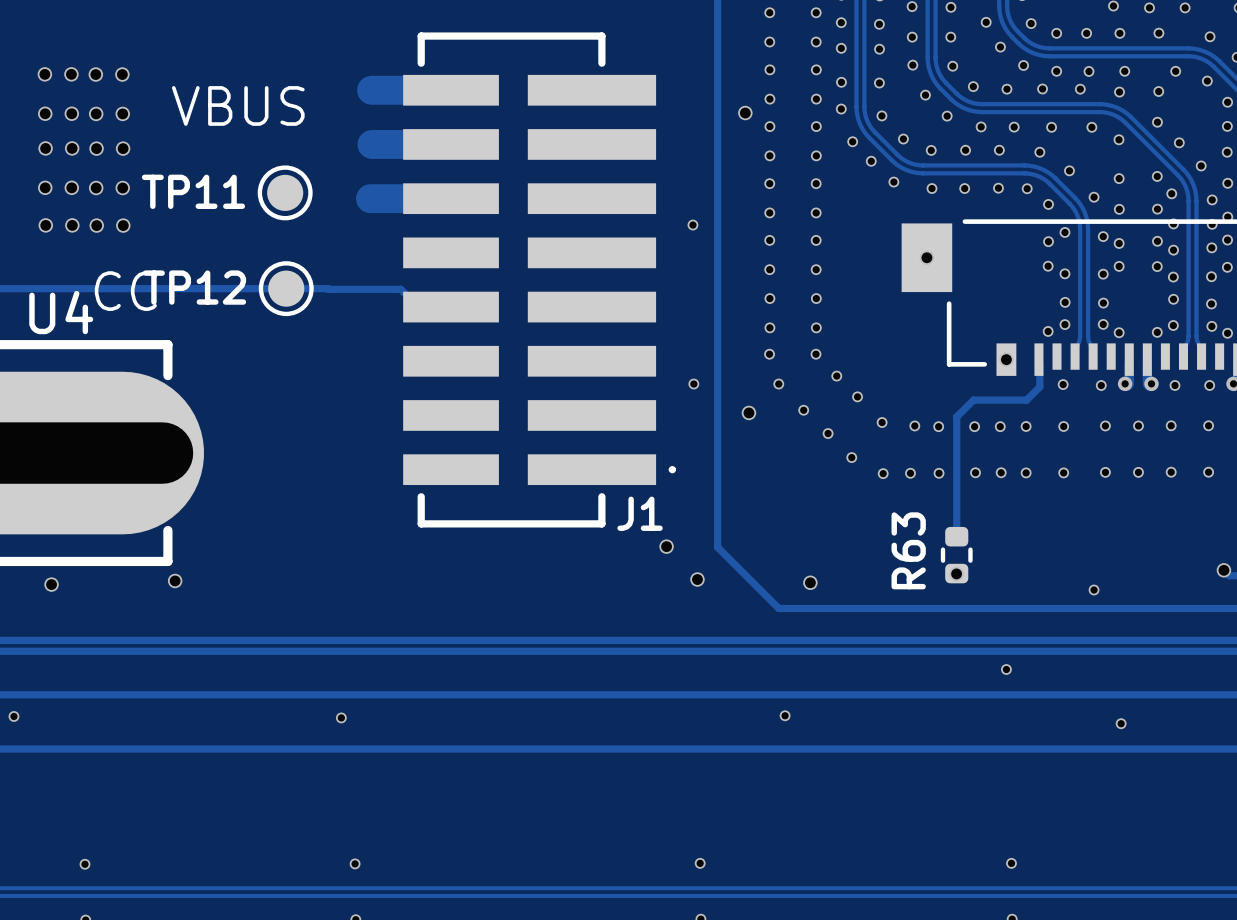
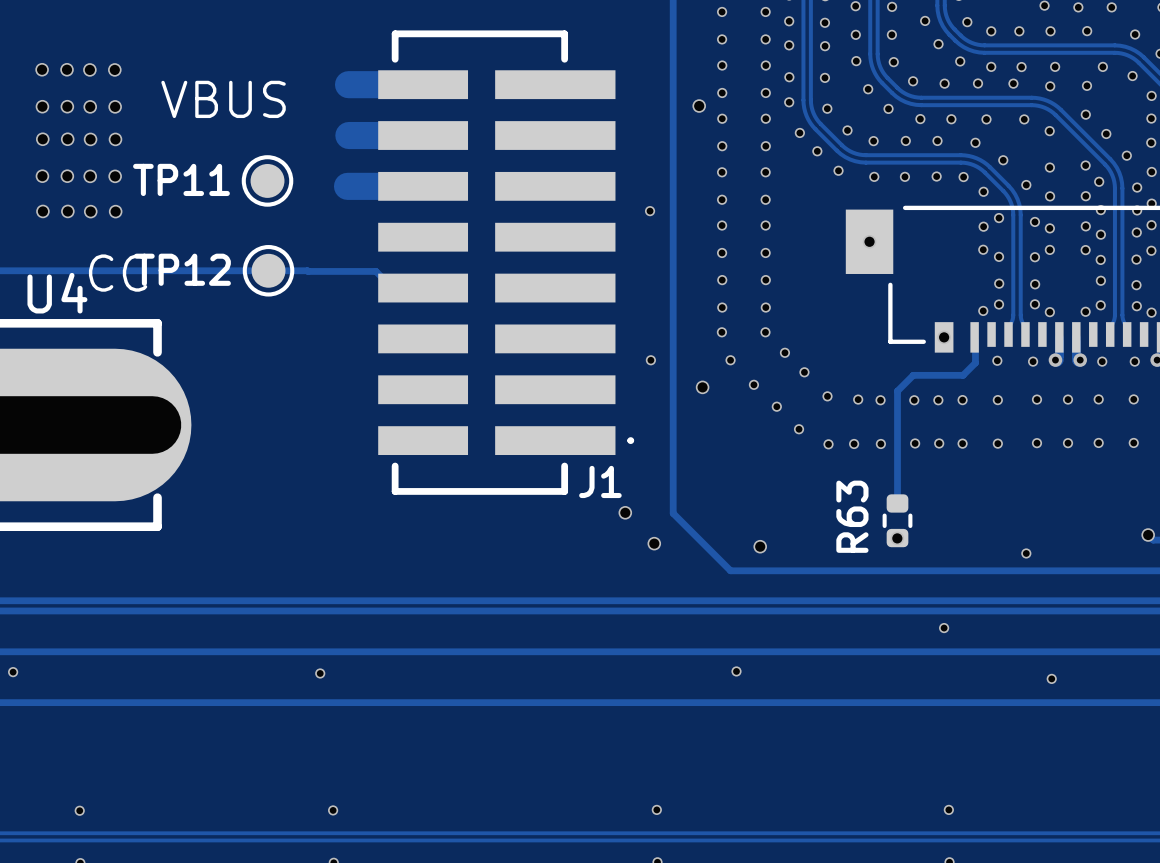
via: (175, 580) -> none
via: (51, 584) -> none

